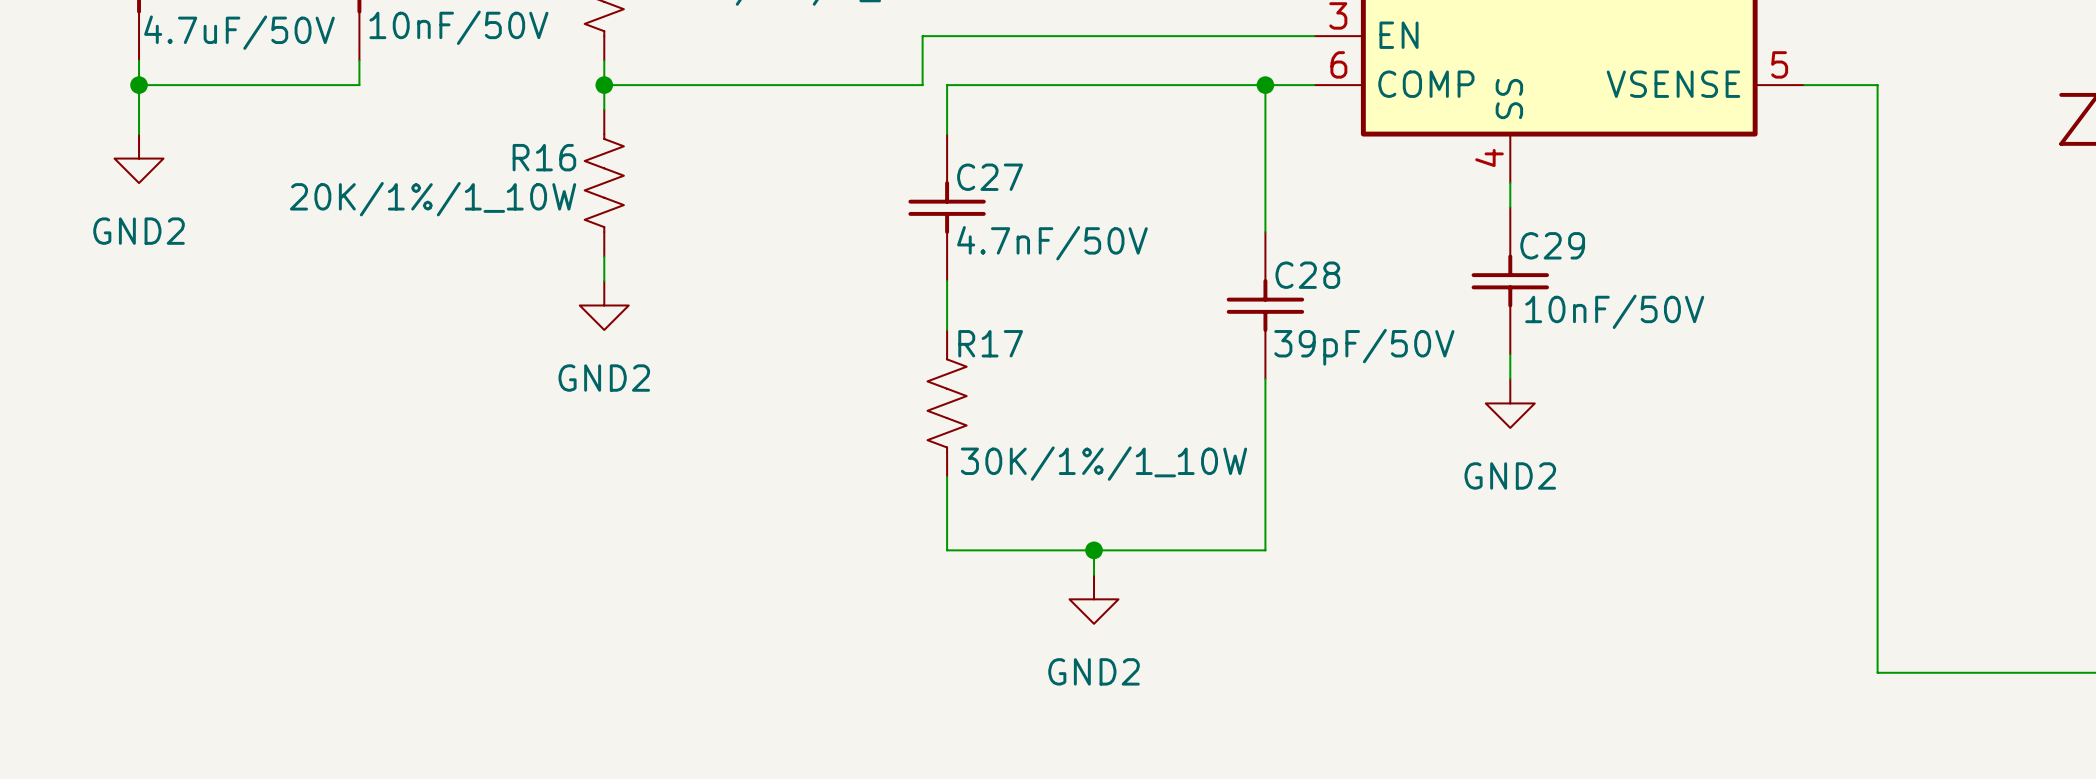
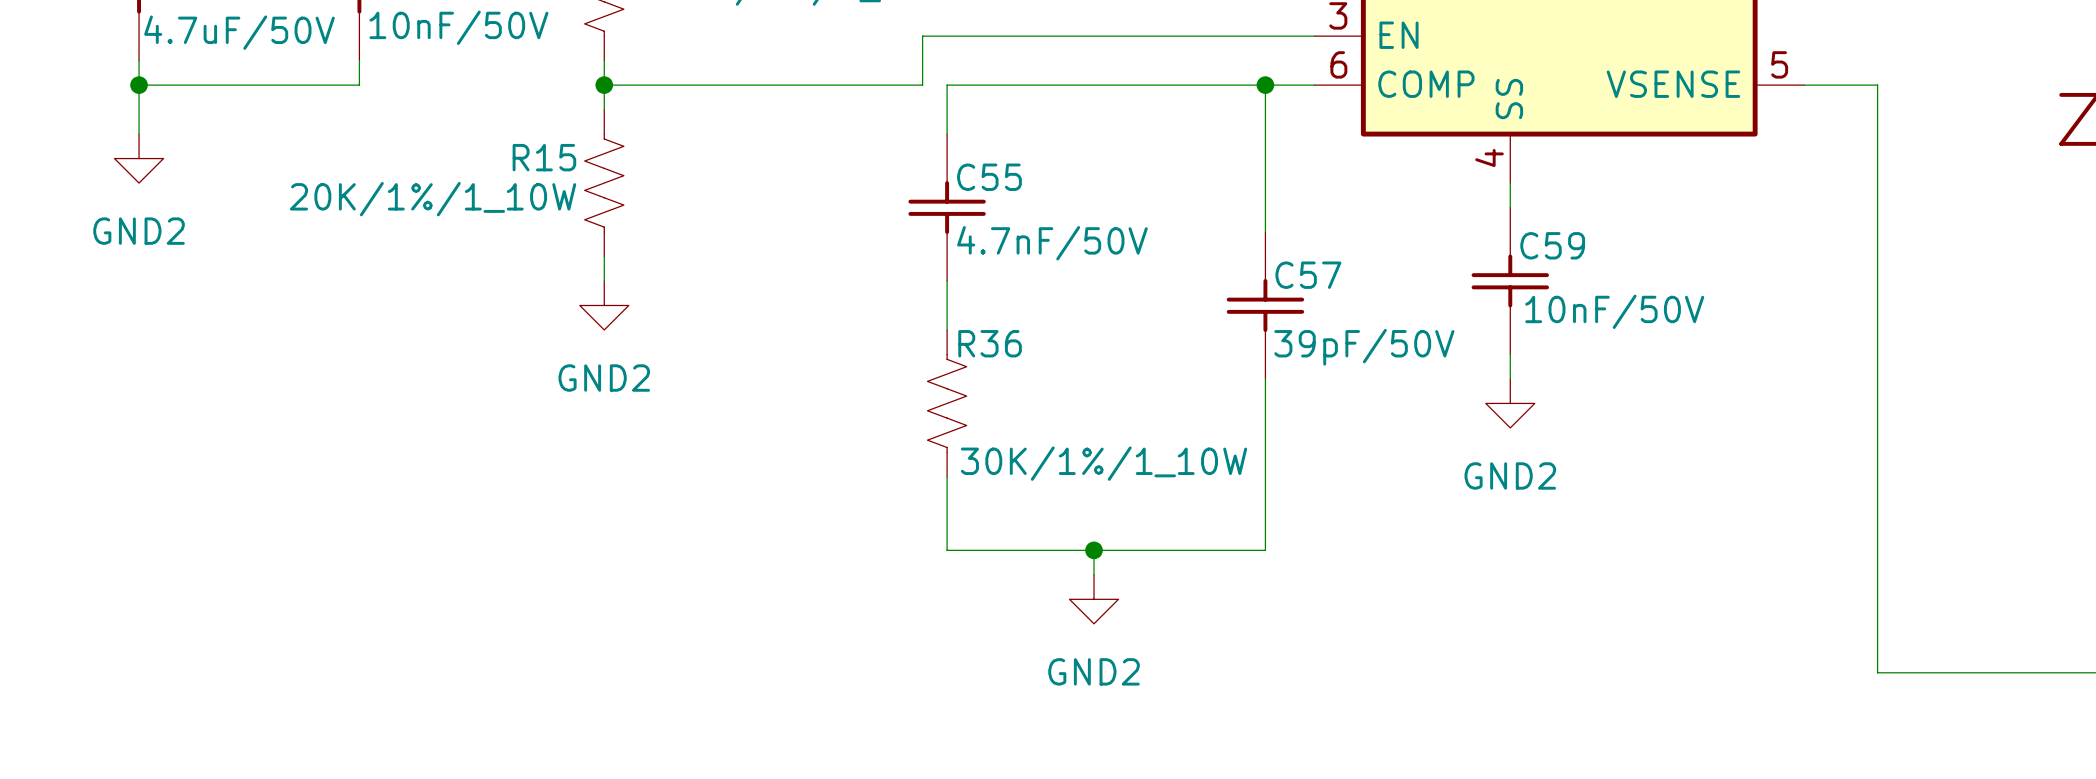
R16 name: R16 (544, 157) -> R15 (544, 157)
C27 name: C27 (990, 177) -> C55 (989, 177)
C29 name: C29 (1552, 245) -> C59 (1552, 245)
C28 name: C28 (1307, 275) -> C57 (1308, 275)
R17 name: R17 (990, 343) -> R36 (990, 343)

